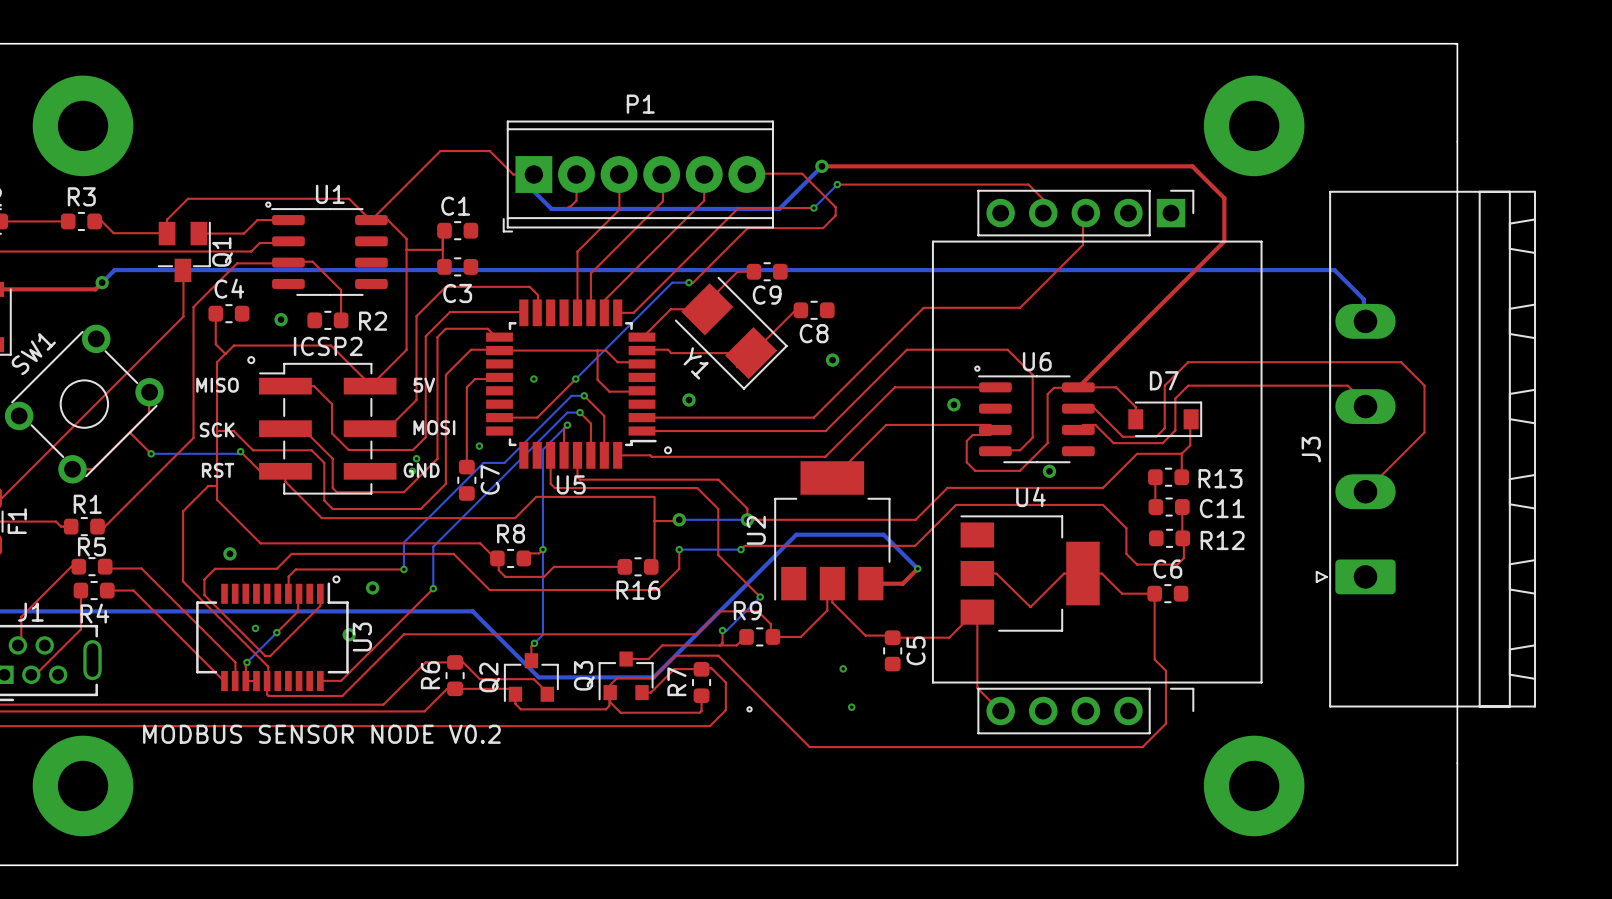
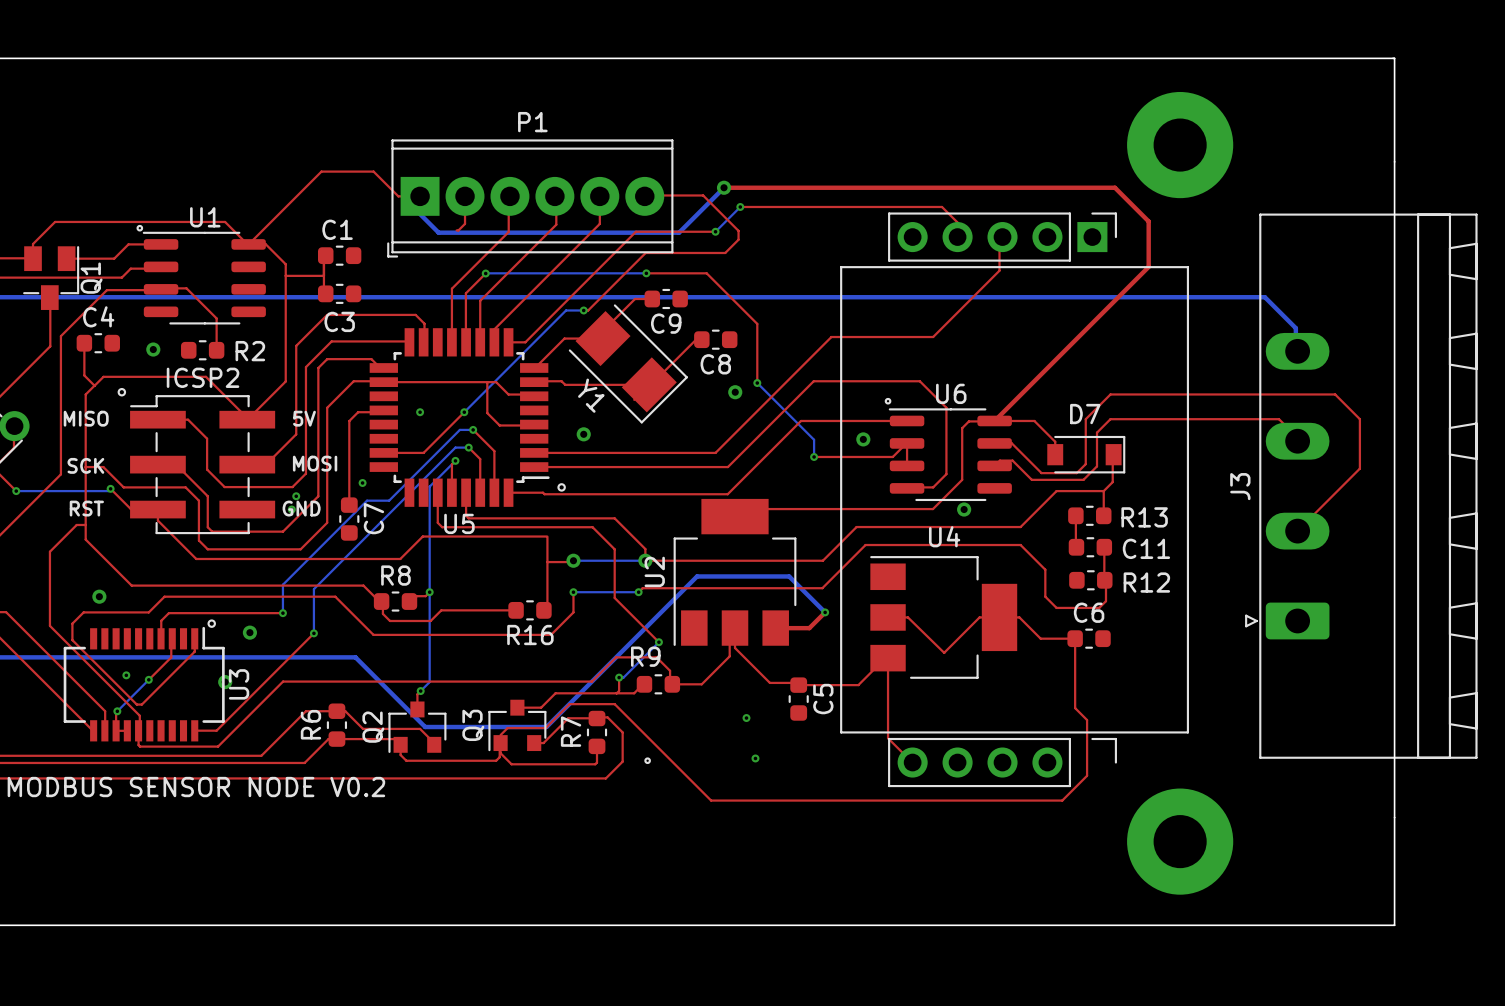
top track: (619, 176) (619, 209) (577, 251) (577, 312) -> (485, 273) (465, 293) (465, 342)
top track: none -> (508, 199) (508, 231) (451, 288) (451, 342)
bottom track: none -> (485, 273) (646, 273)
via: none -> (485, 273)
top track: none -> (646, 273) (706, 273) (757, 323) (757, 383)
via: none -> (646, 273)
bottom track: none -> (757, 383) (814, 439) (814, 456)
via: none -> (757, 383)
top track: none -> (814, 456) (892, 456) (907, 442) (907, 465)
via: none -> (814, 456)
top track: (975, 470) (966, 462) (966, 441) (972, 434) (990, 434) (995, 429) (990, 424) (886, 424) (831, 479) -> (885, 509) (742, 509) (735, 516)

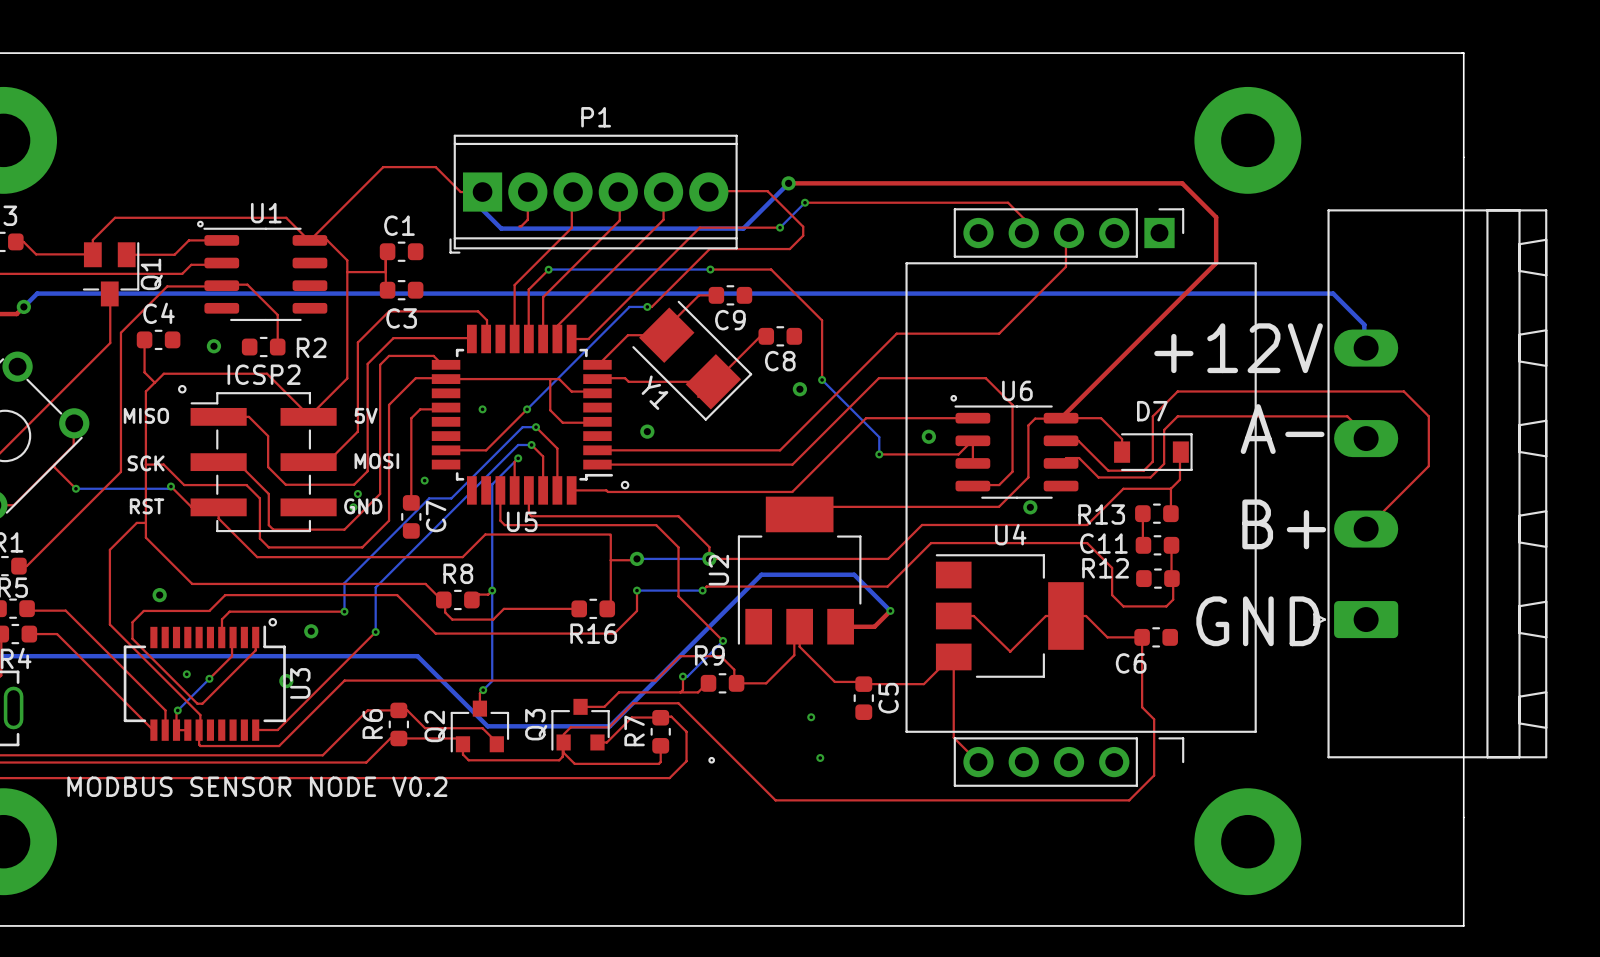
text: none -> +12V (1238, 348)
text: none -> A- (1282, 429)
J3 name: J3 (1240, 486) -> none
R13 name position: R13 (1144, 517) -> R13 (1101, 514)
text: none -> B+ (1284, 524)
C11 name position: C11 (1146, 548) -> C11 (1103, 543)
R12 name position: R12 (1146, 582) -> R12 (1105, 568)
C6 name position: C6 (1089, 612) -> C6 (1131, 663)
text: none -> GND (1258, 621)

